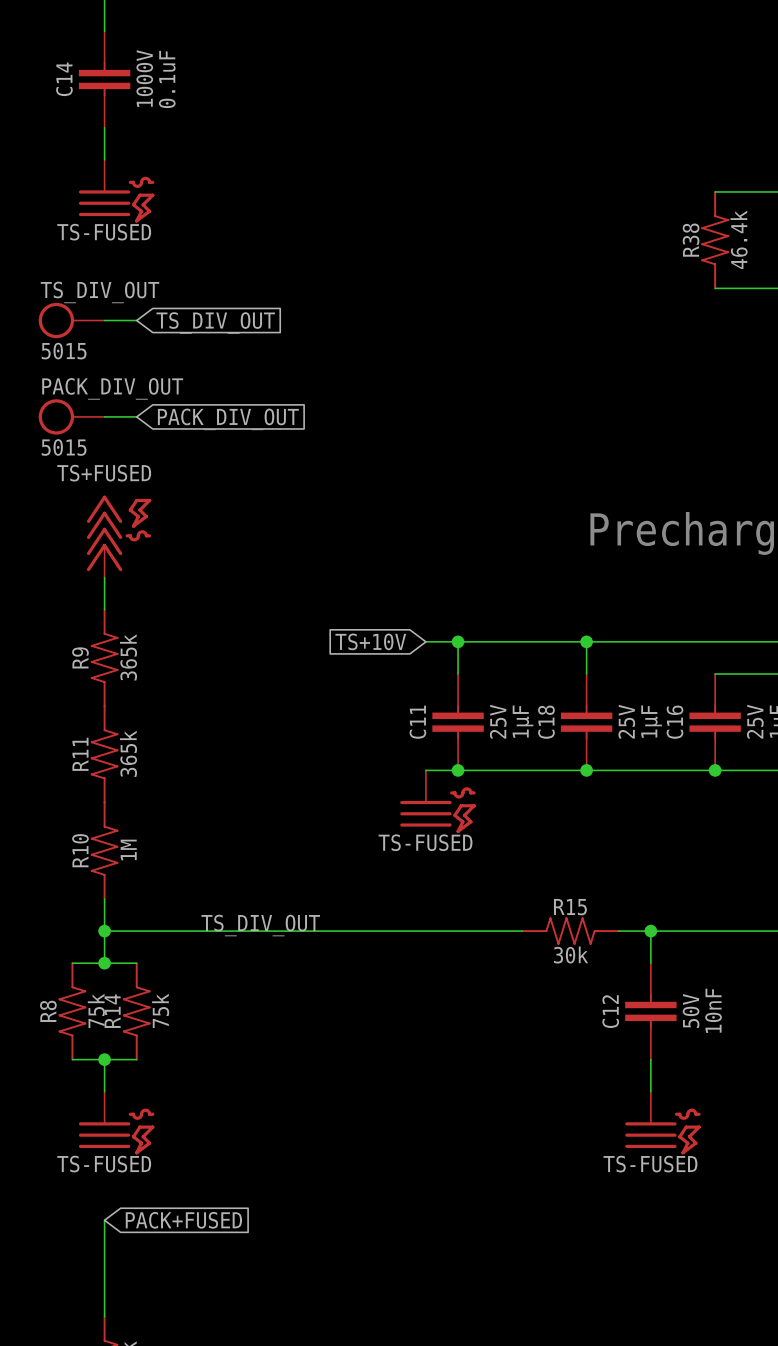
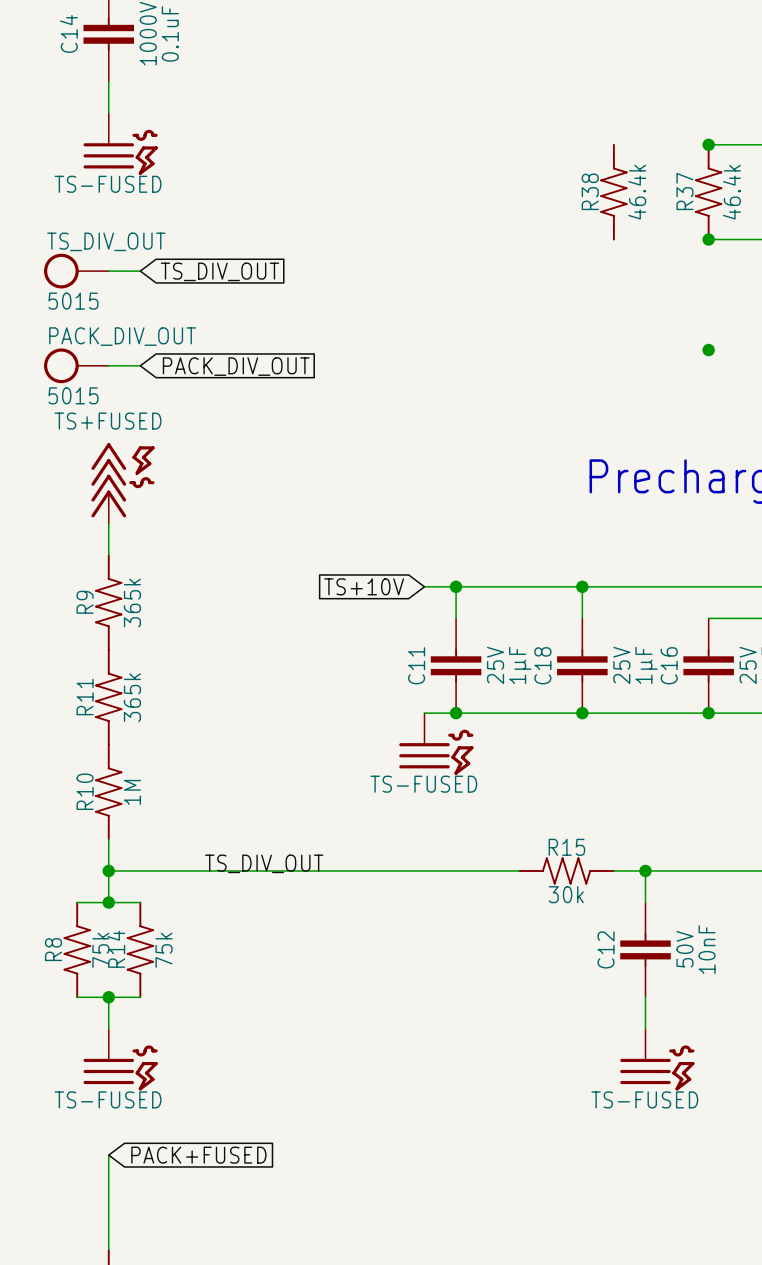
junction: none -> (708, 144)
R38: none -> (613, 192)
R38 name: R38 (691, 240) -> R37 (684, 191)
junction: none -> (708, 239)
junction: none -> (708, 350)

